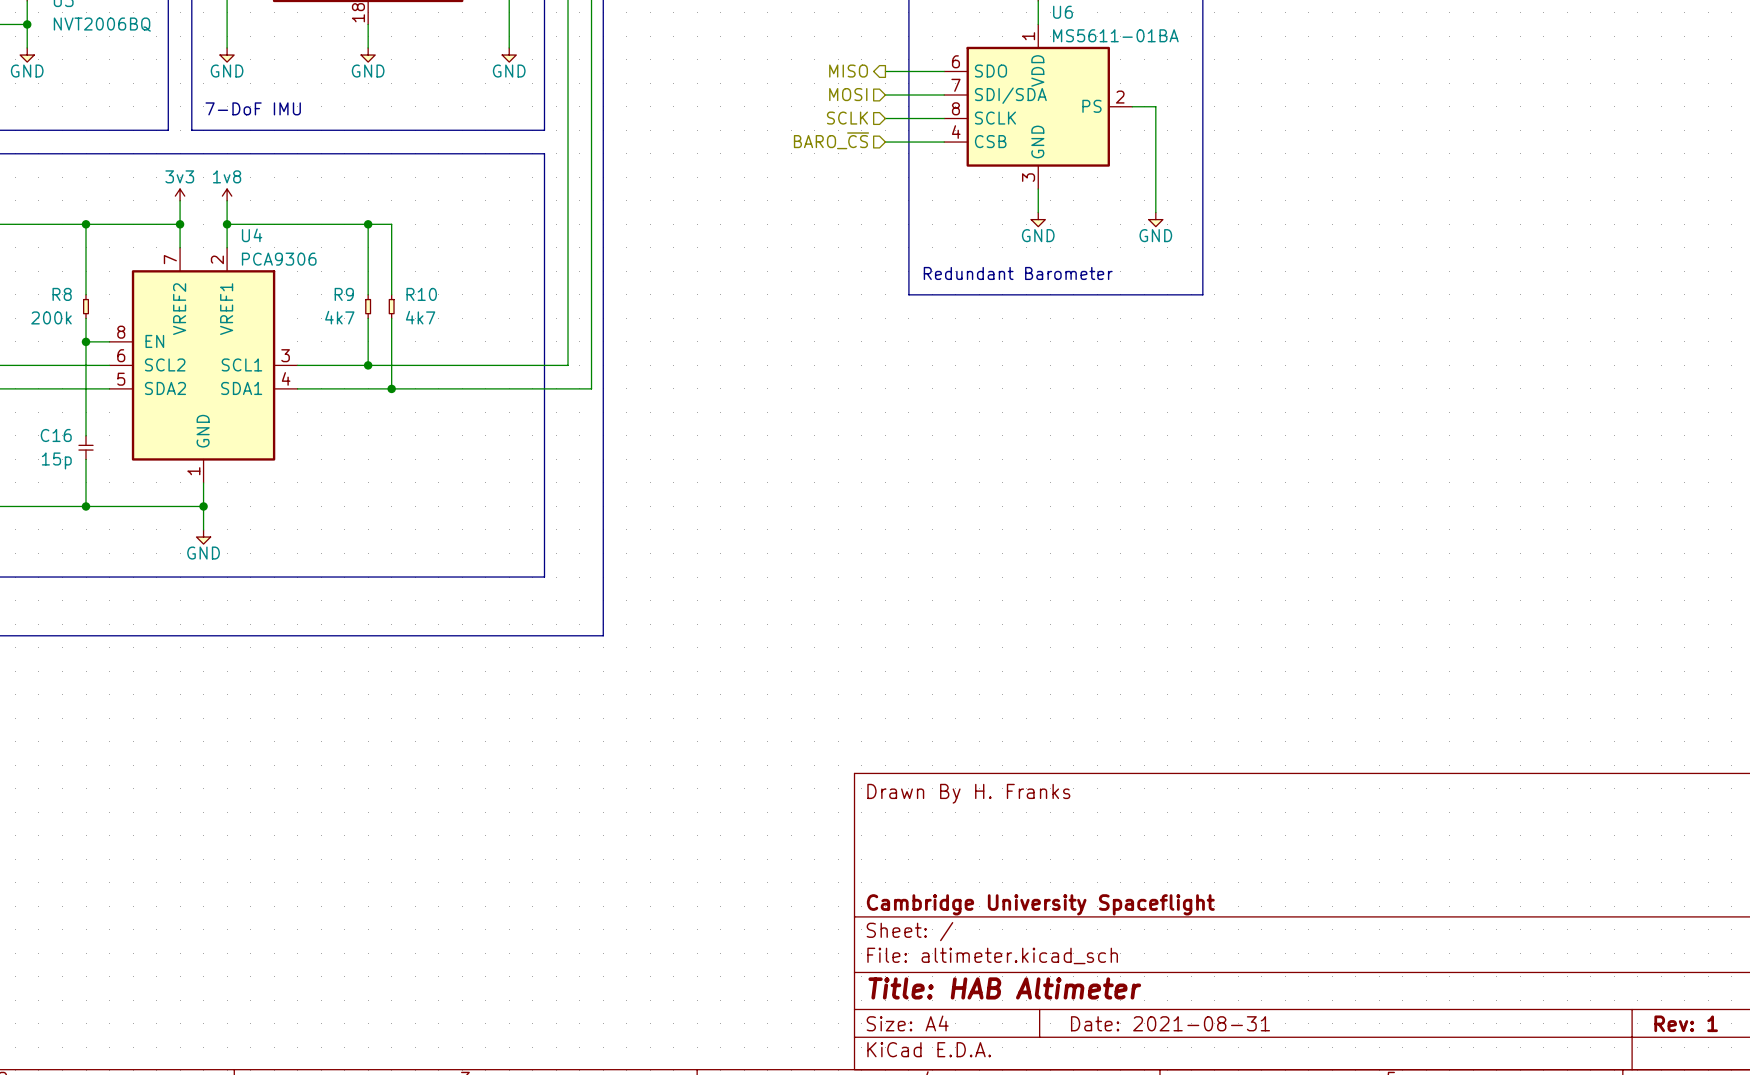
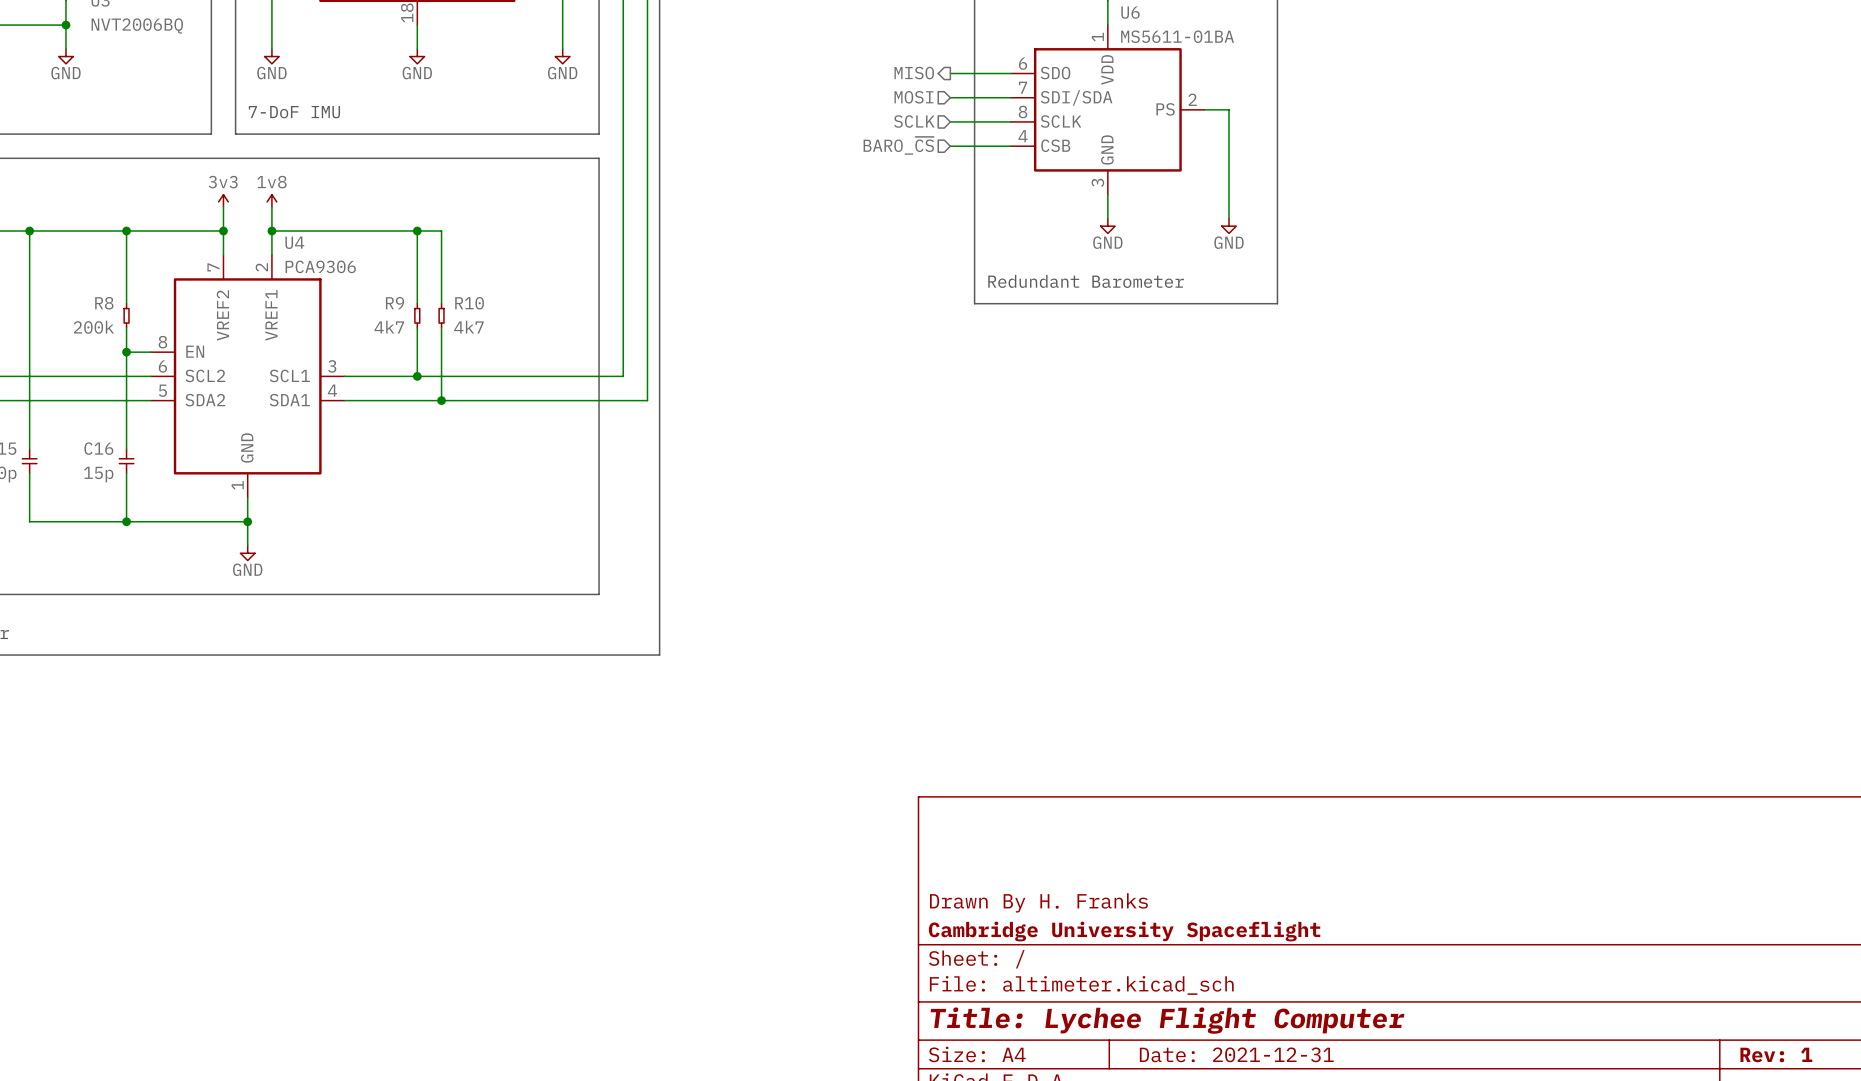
title block position: Drawn By H. Franks (968, 793) -> Drawn By H. Franks (1038, 902)
title block: Title: HAB Altimeter (1004, 988) -> Title: Lychee Flight Computer (1167, 1020)
title block: Date: 2021-08-31 (1170, 1023) -> Date: 2021-12-31 (1236, 1054)

